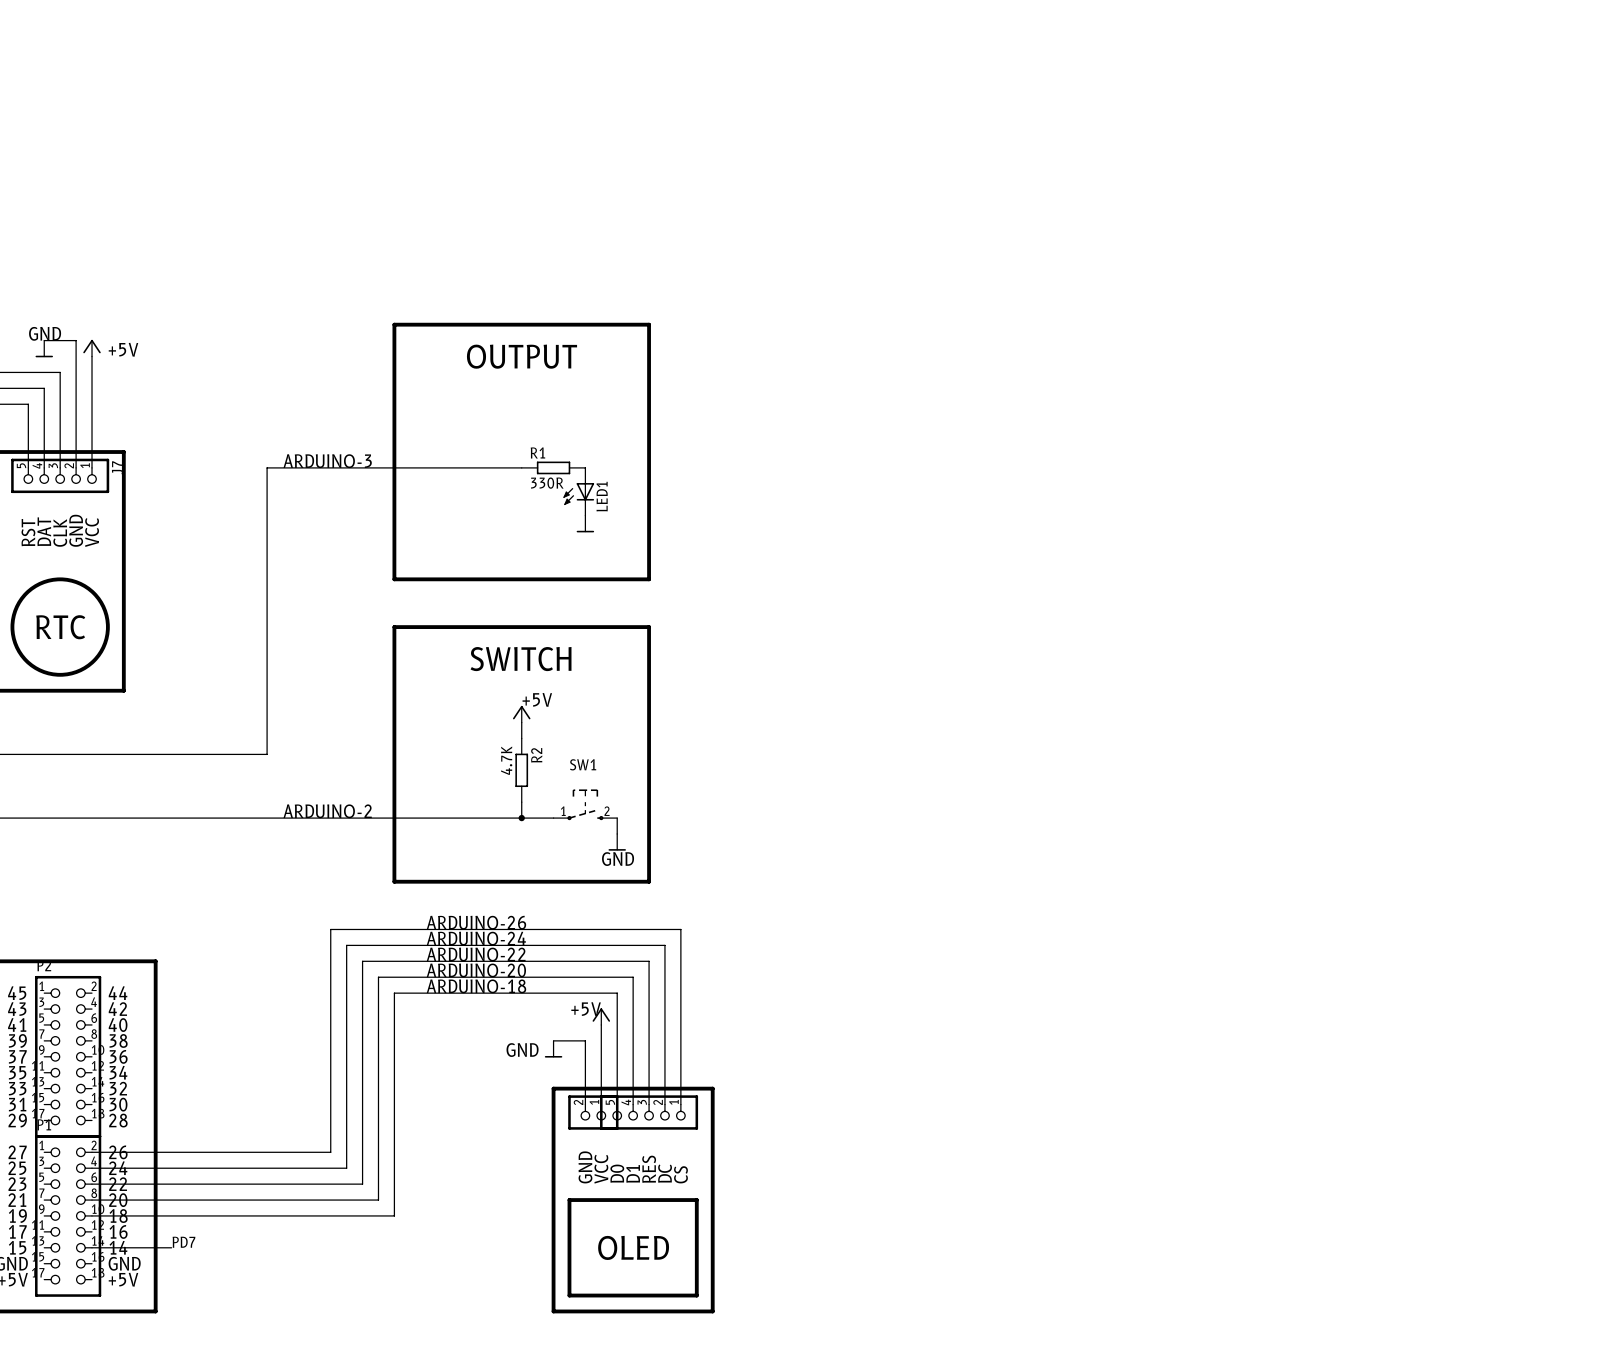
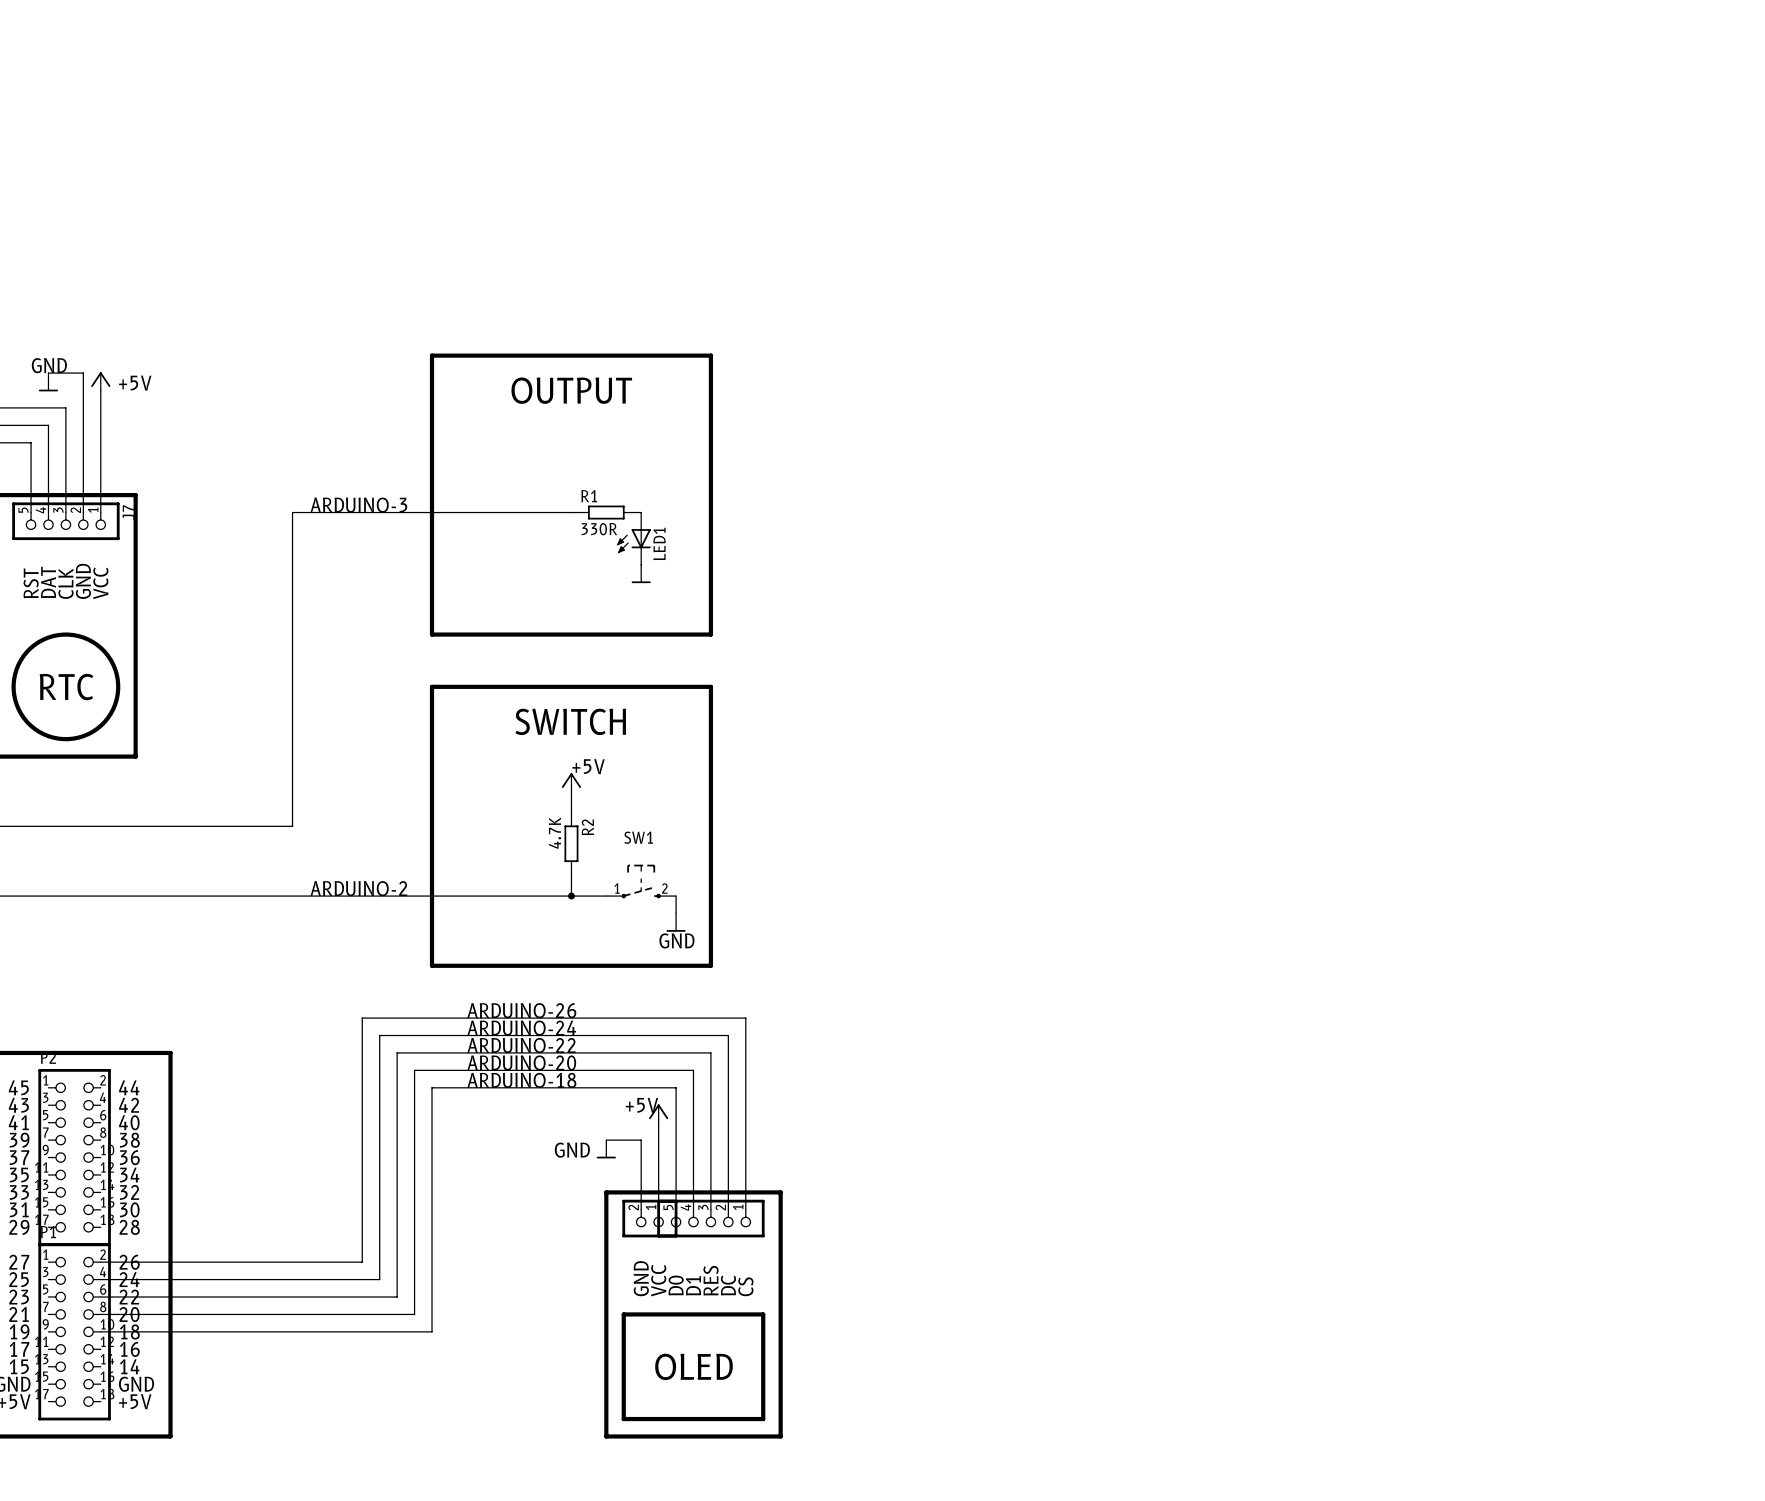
label: PD7 (183, 1242) -> none
wire: (92, 1247) (171, 1247) -> none

